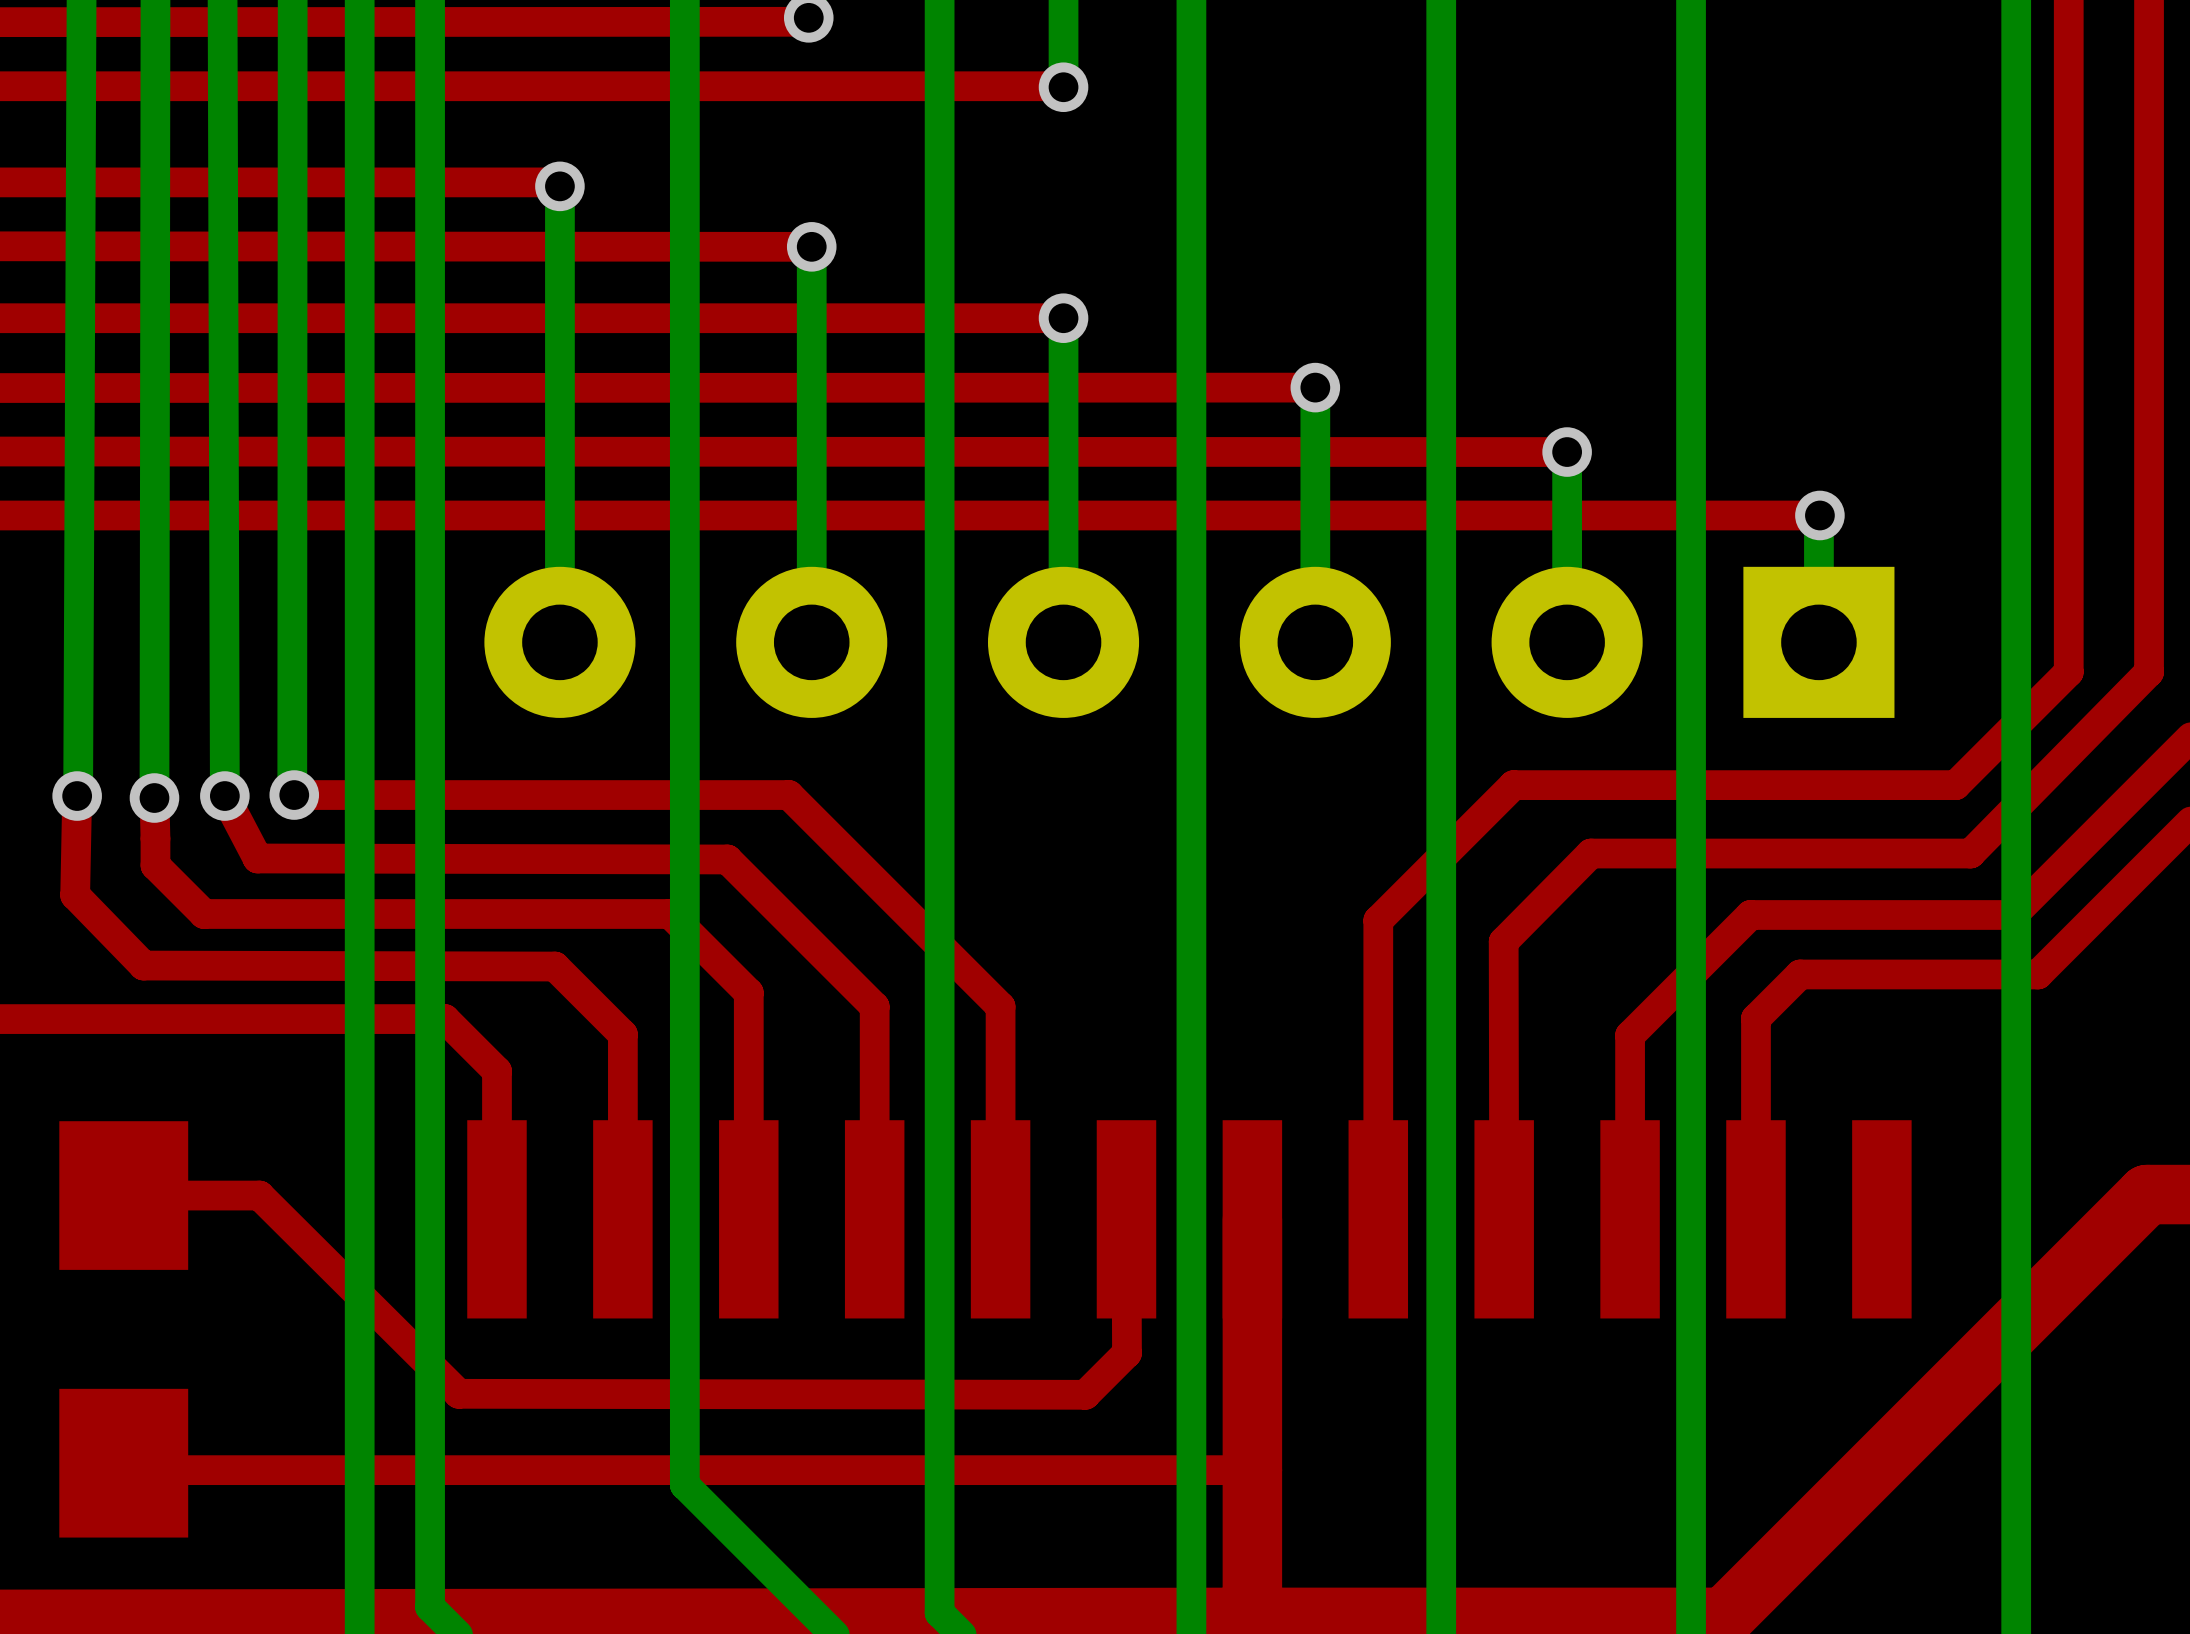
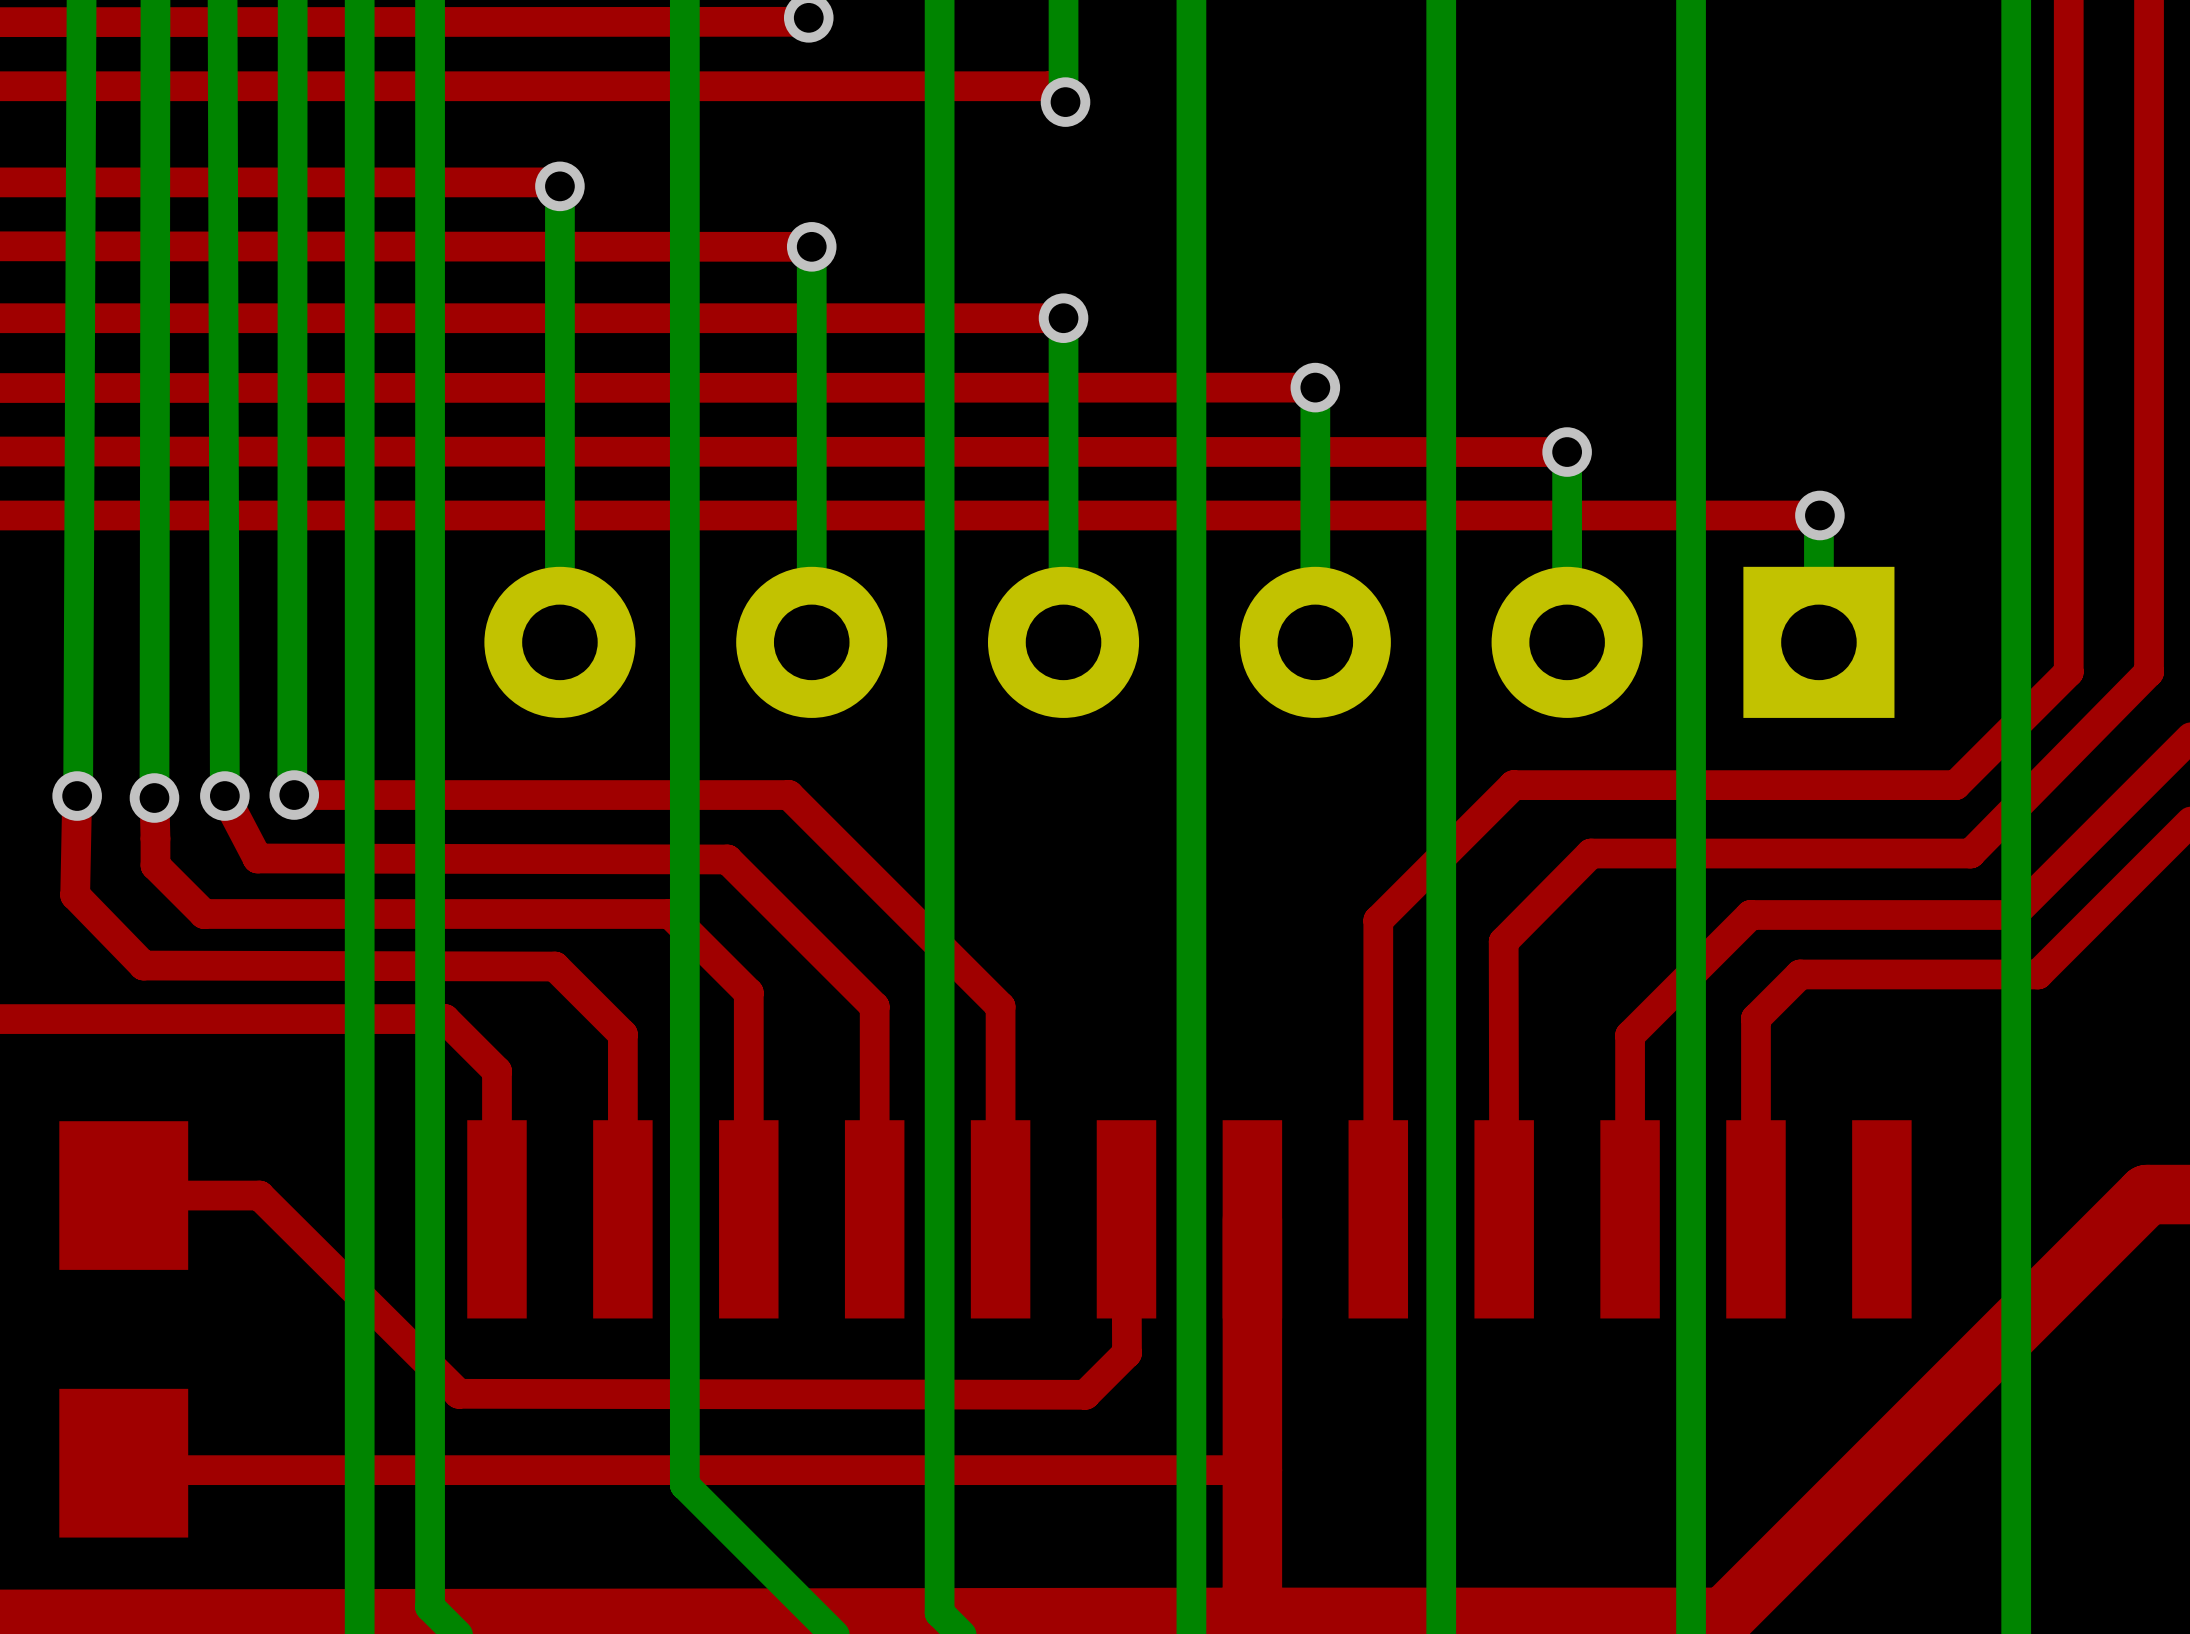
via position: (1063, 87) -> (1065, 102)

